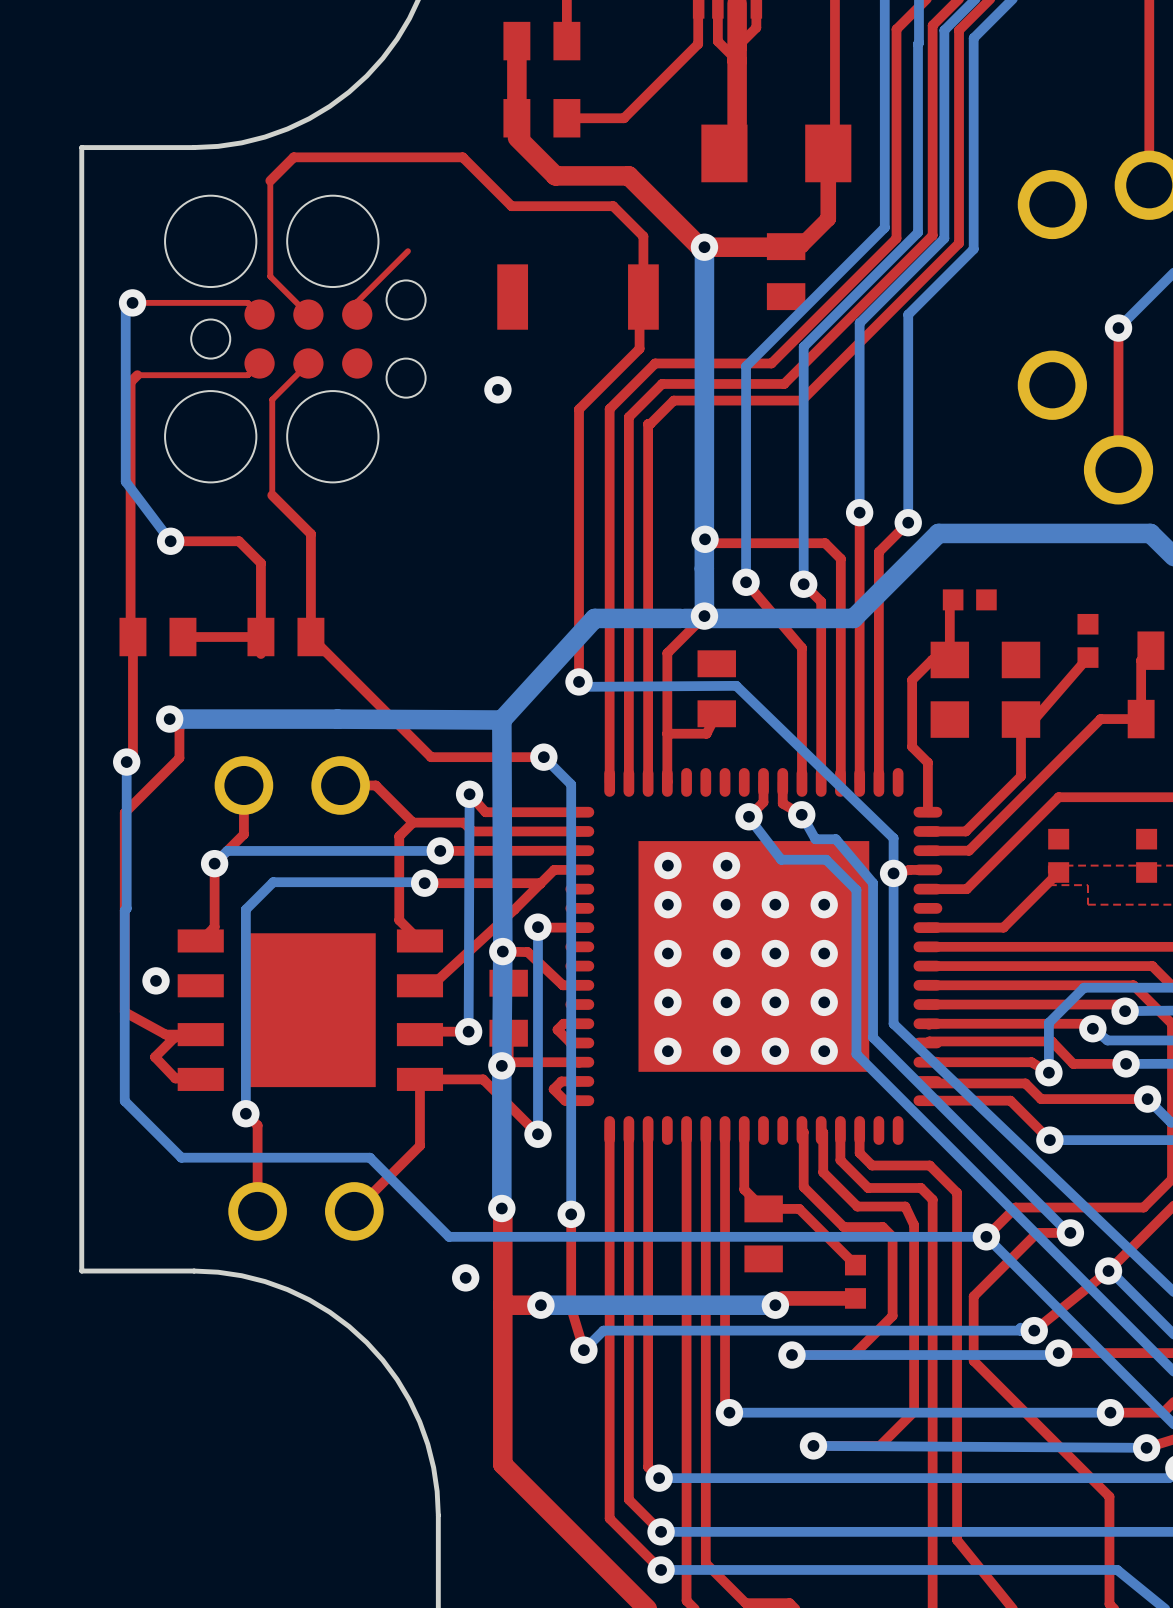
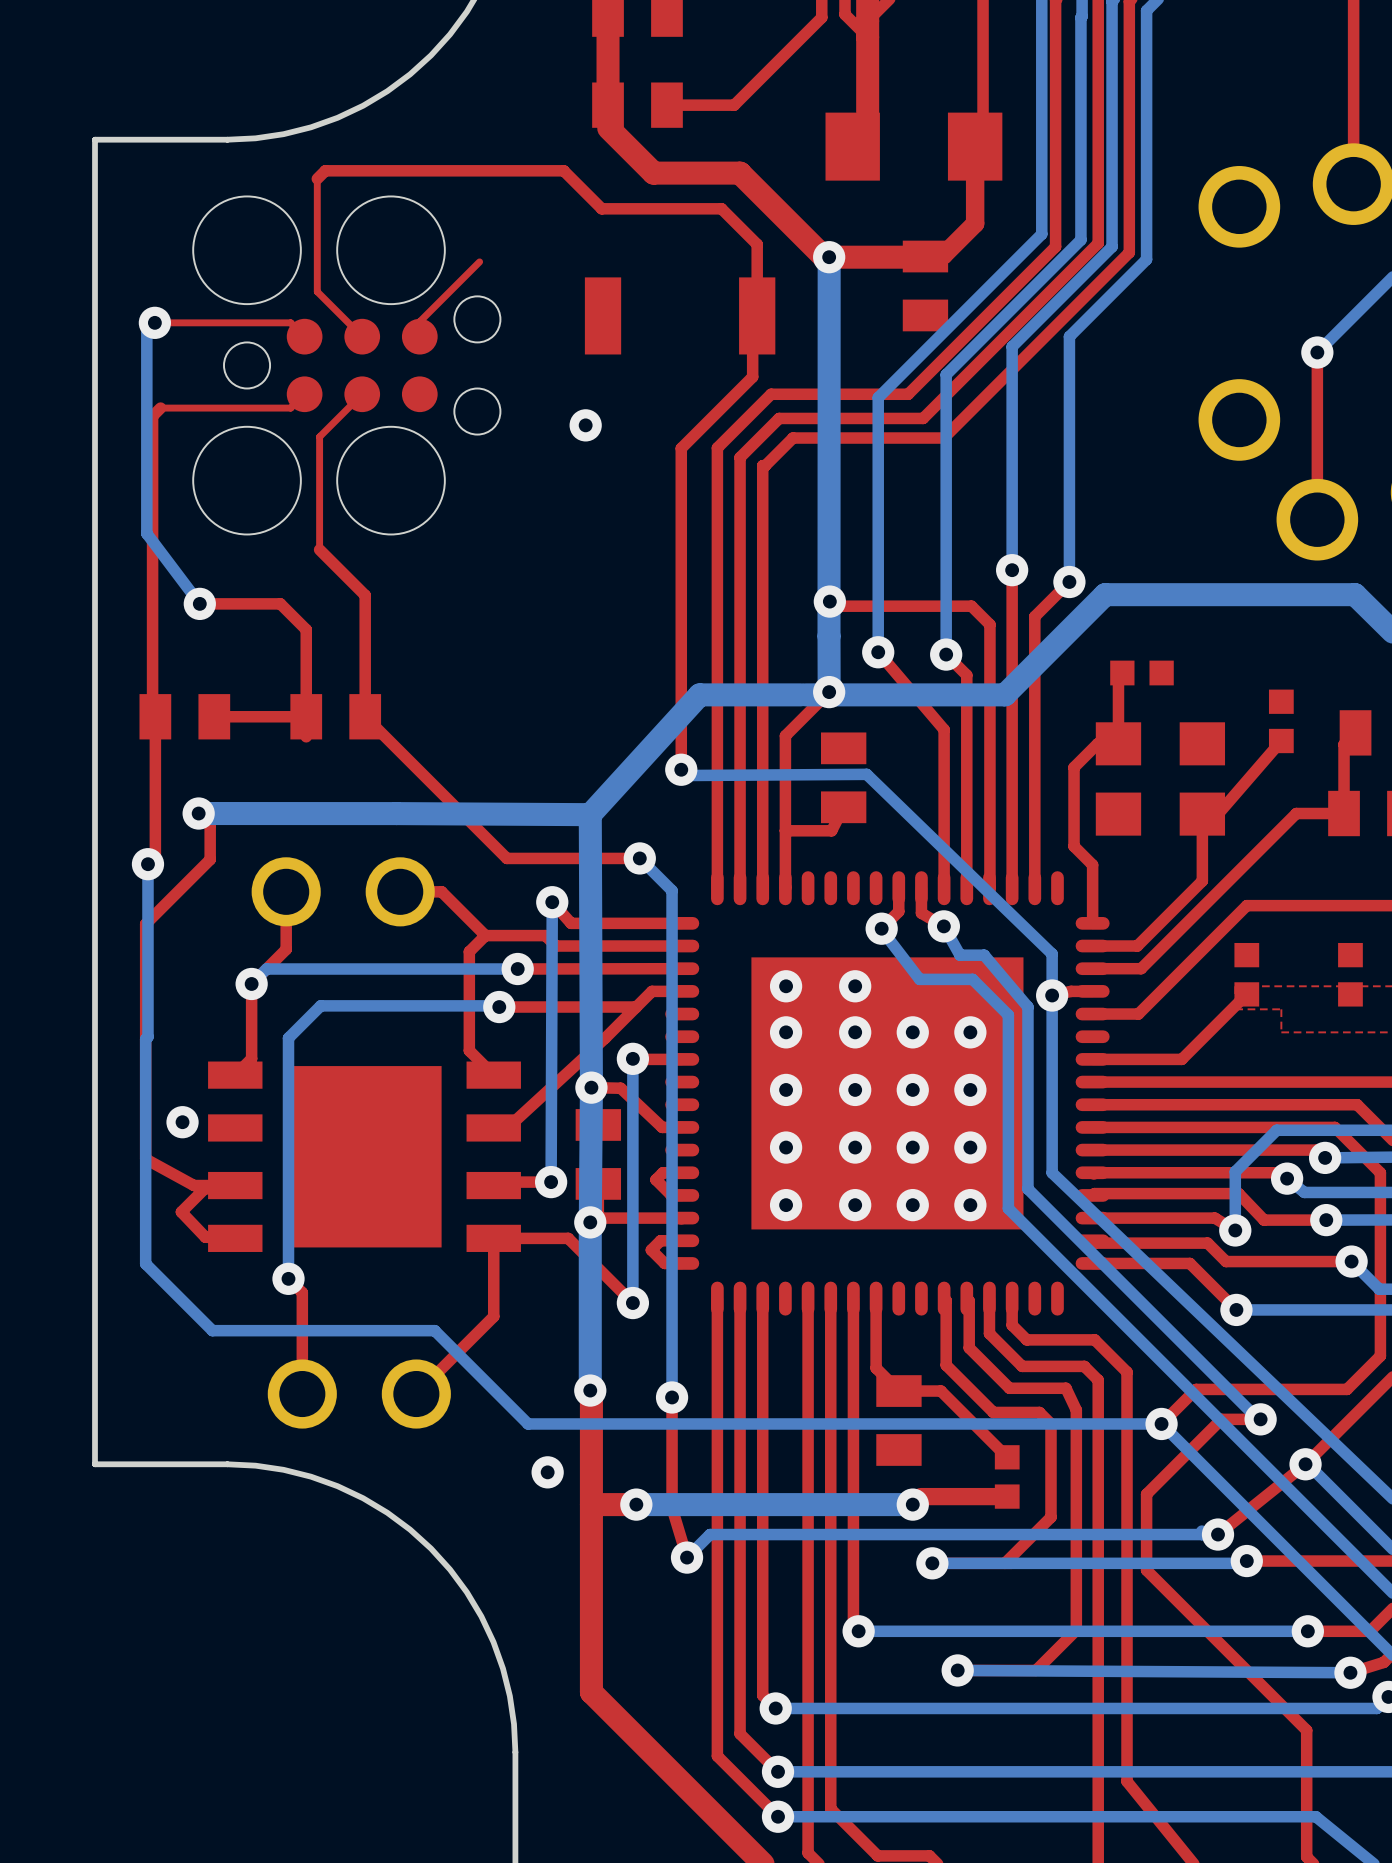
top track: (479, 173) (462, 157) (293, 157) (277, 173) -> (563, 170) (325, 170)

